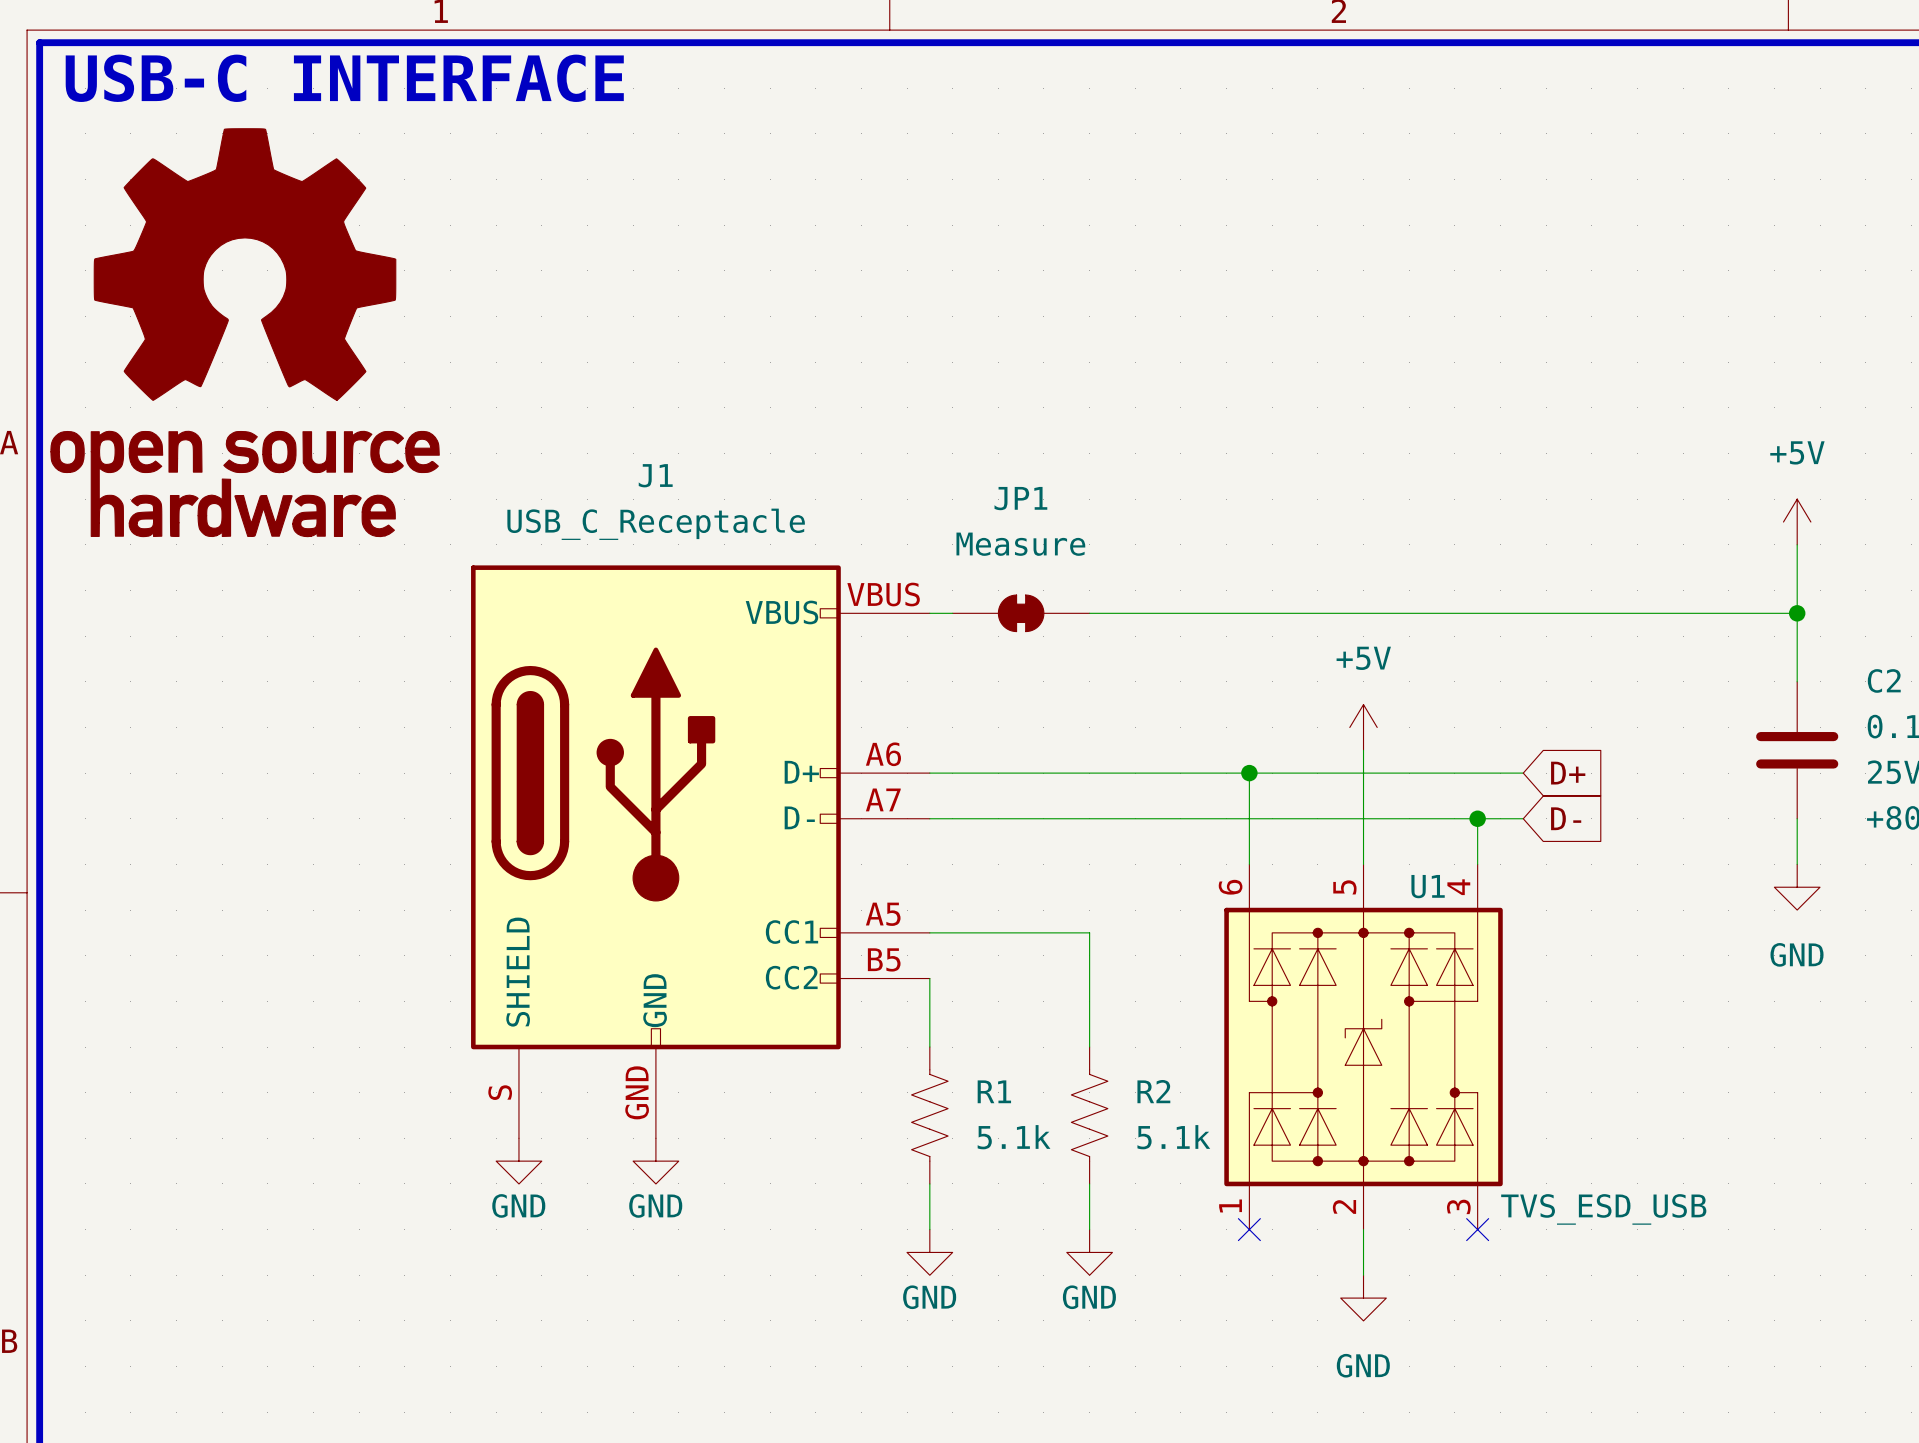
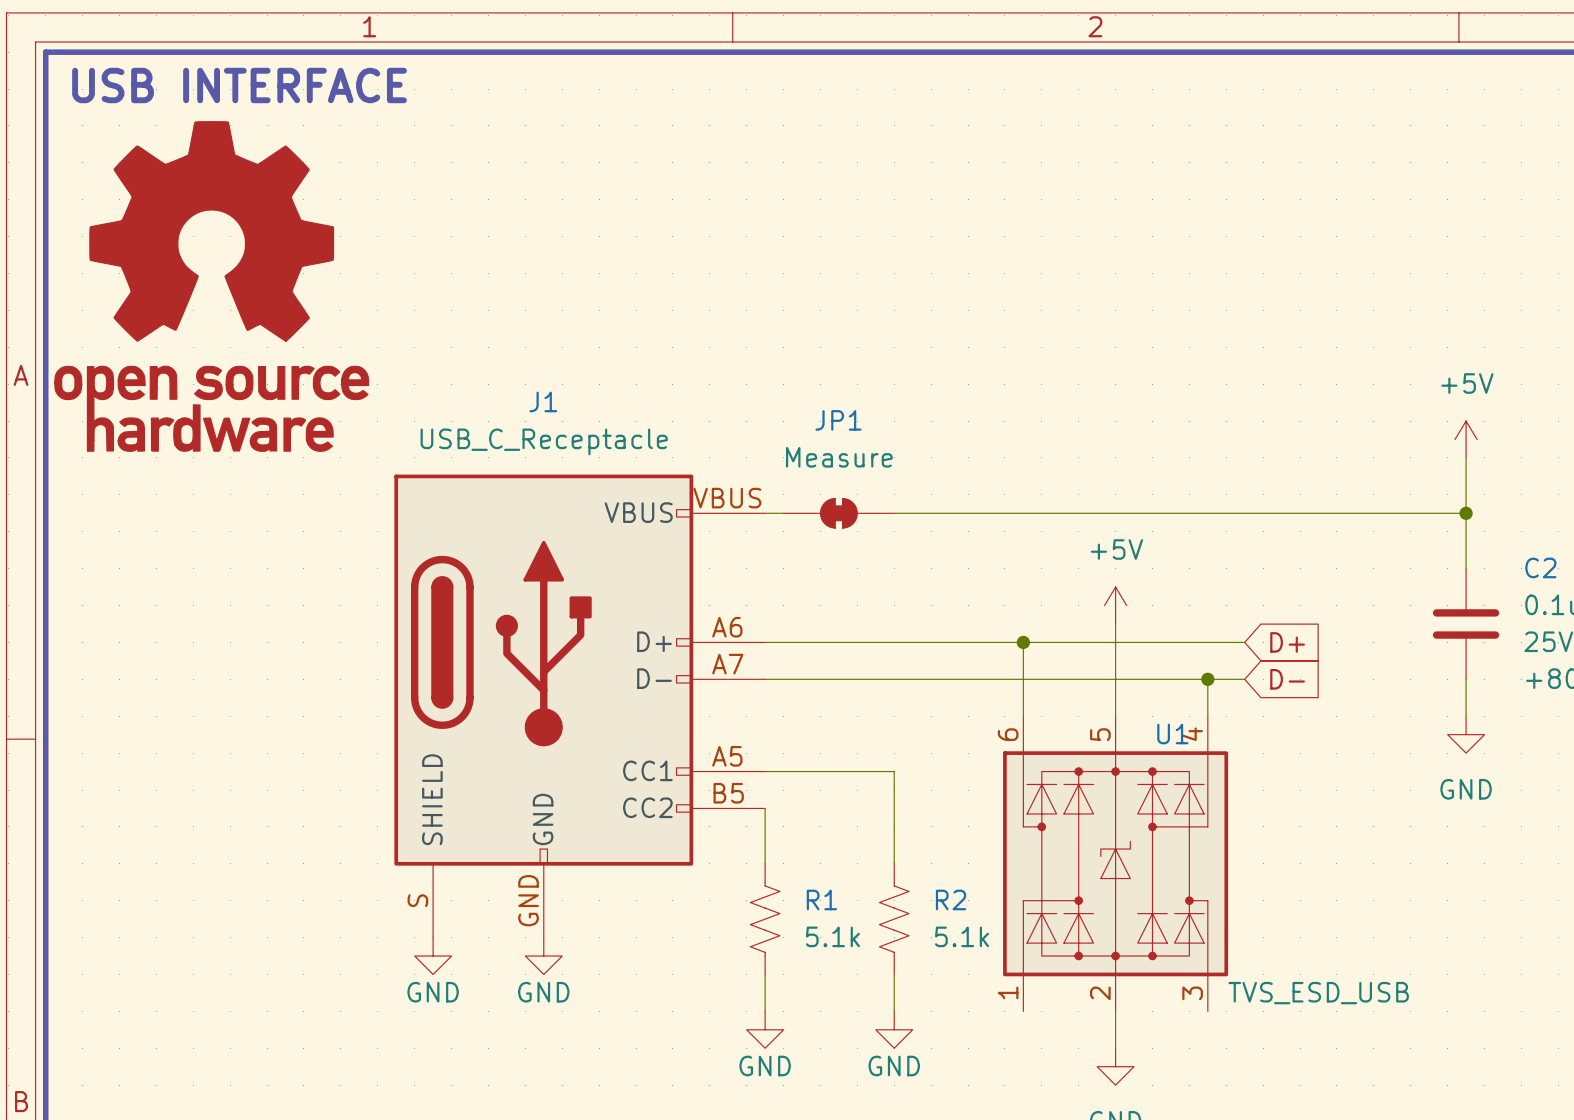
text: USB-C INTERFACE (344, 78) -> USB INTERFACE (239, 85)
no-connect mark: (1249, 1229) -> none
no-connect mark: (1477, 1229) -> none

